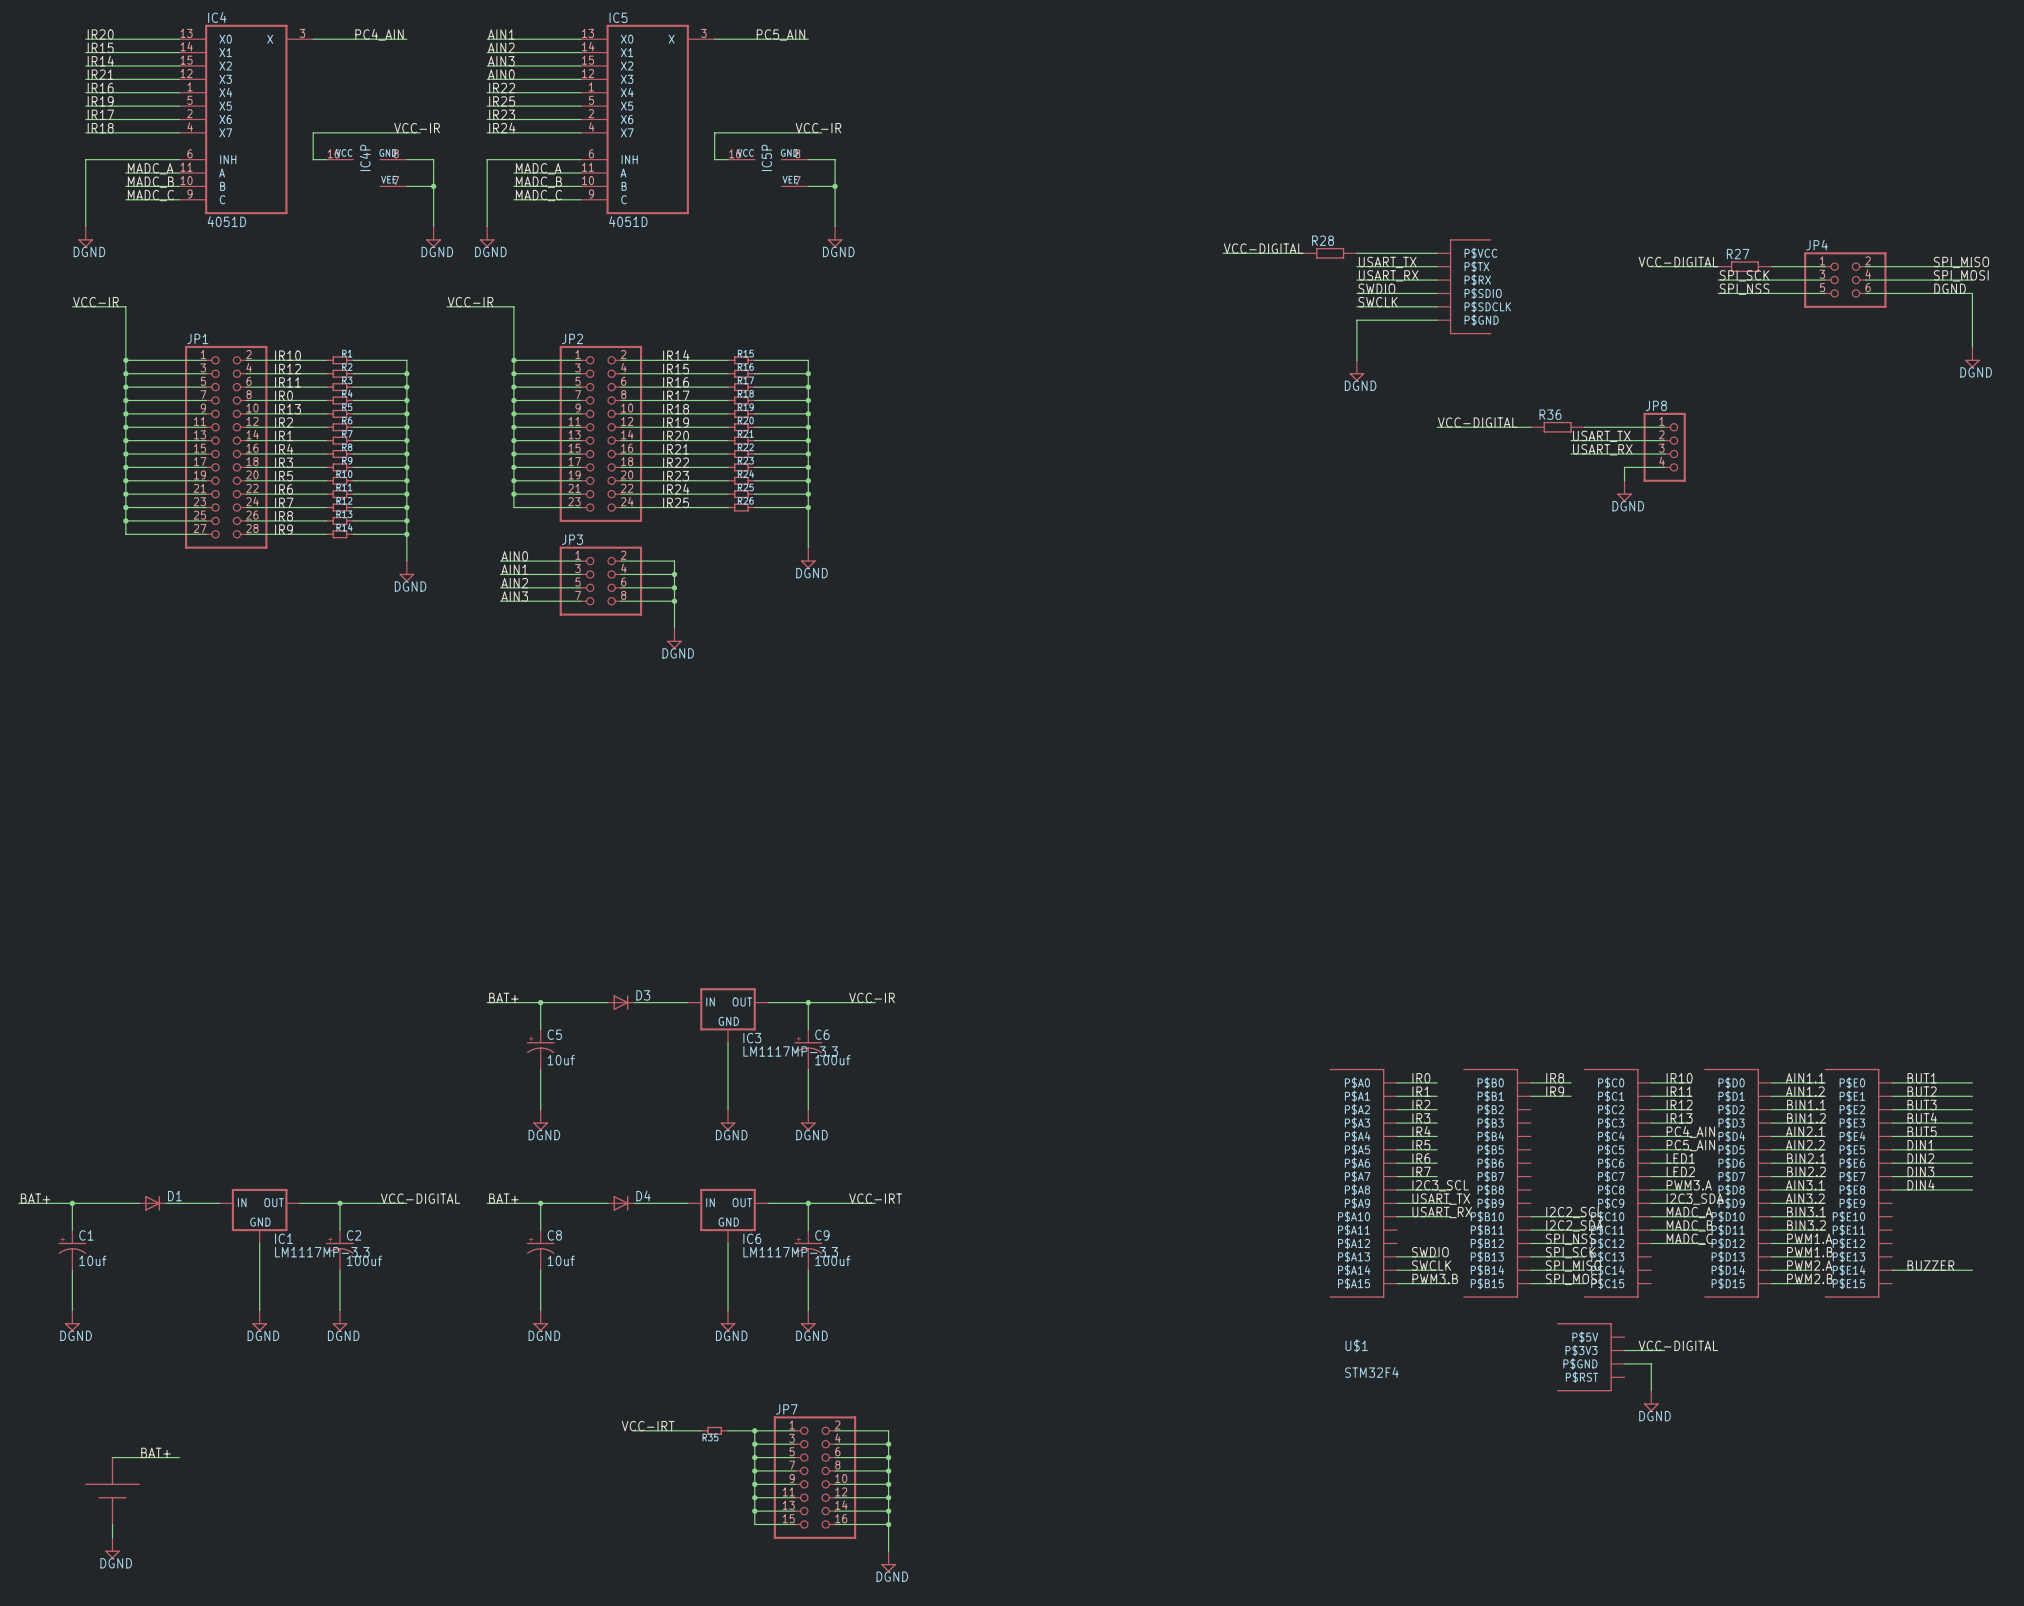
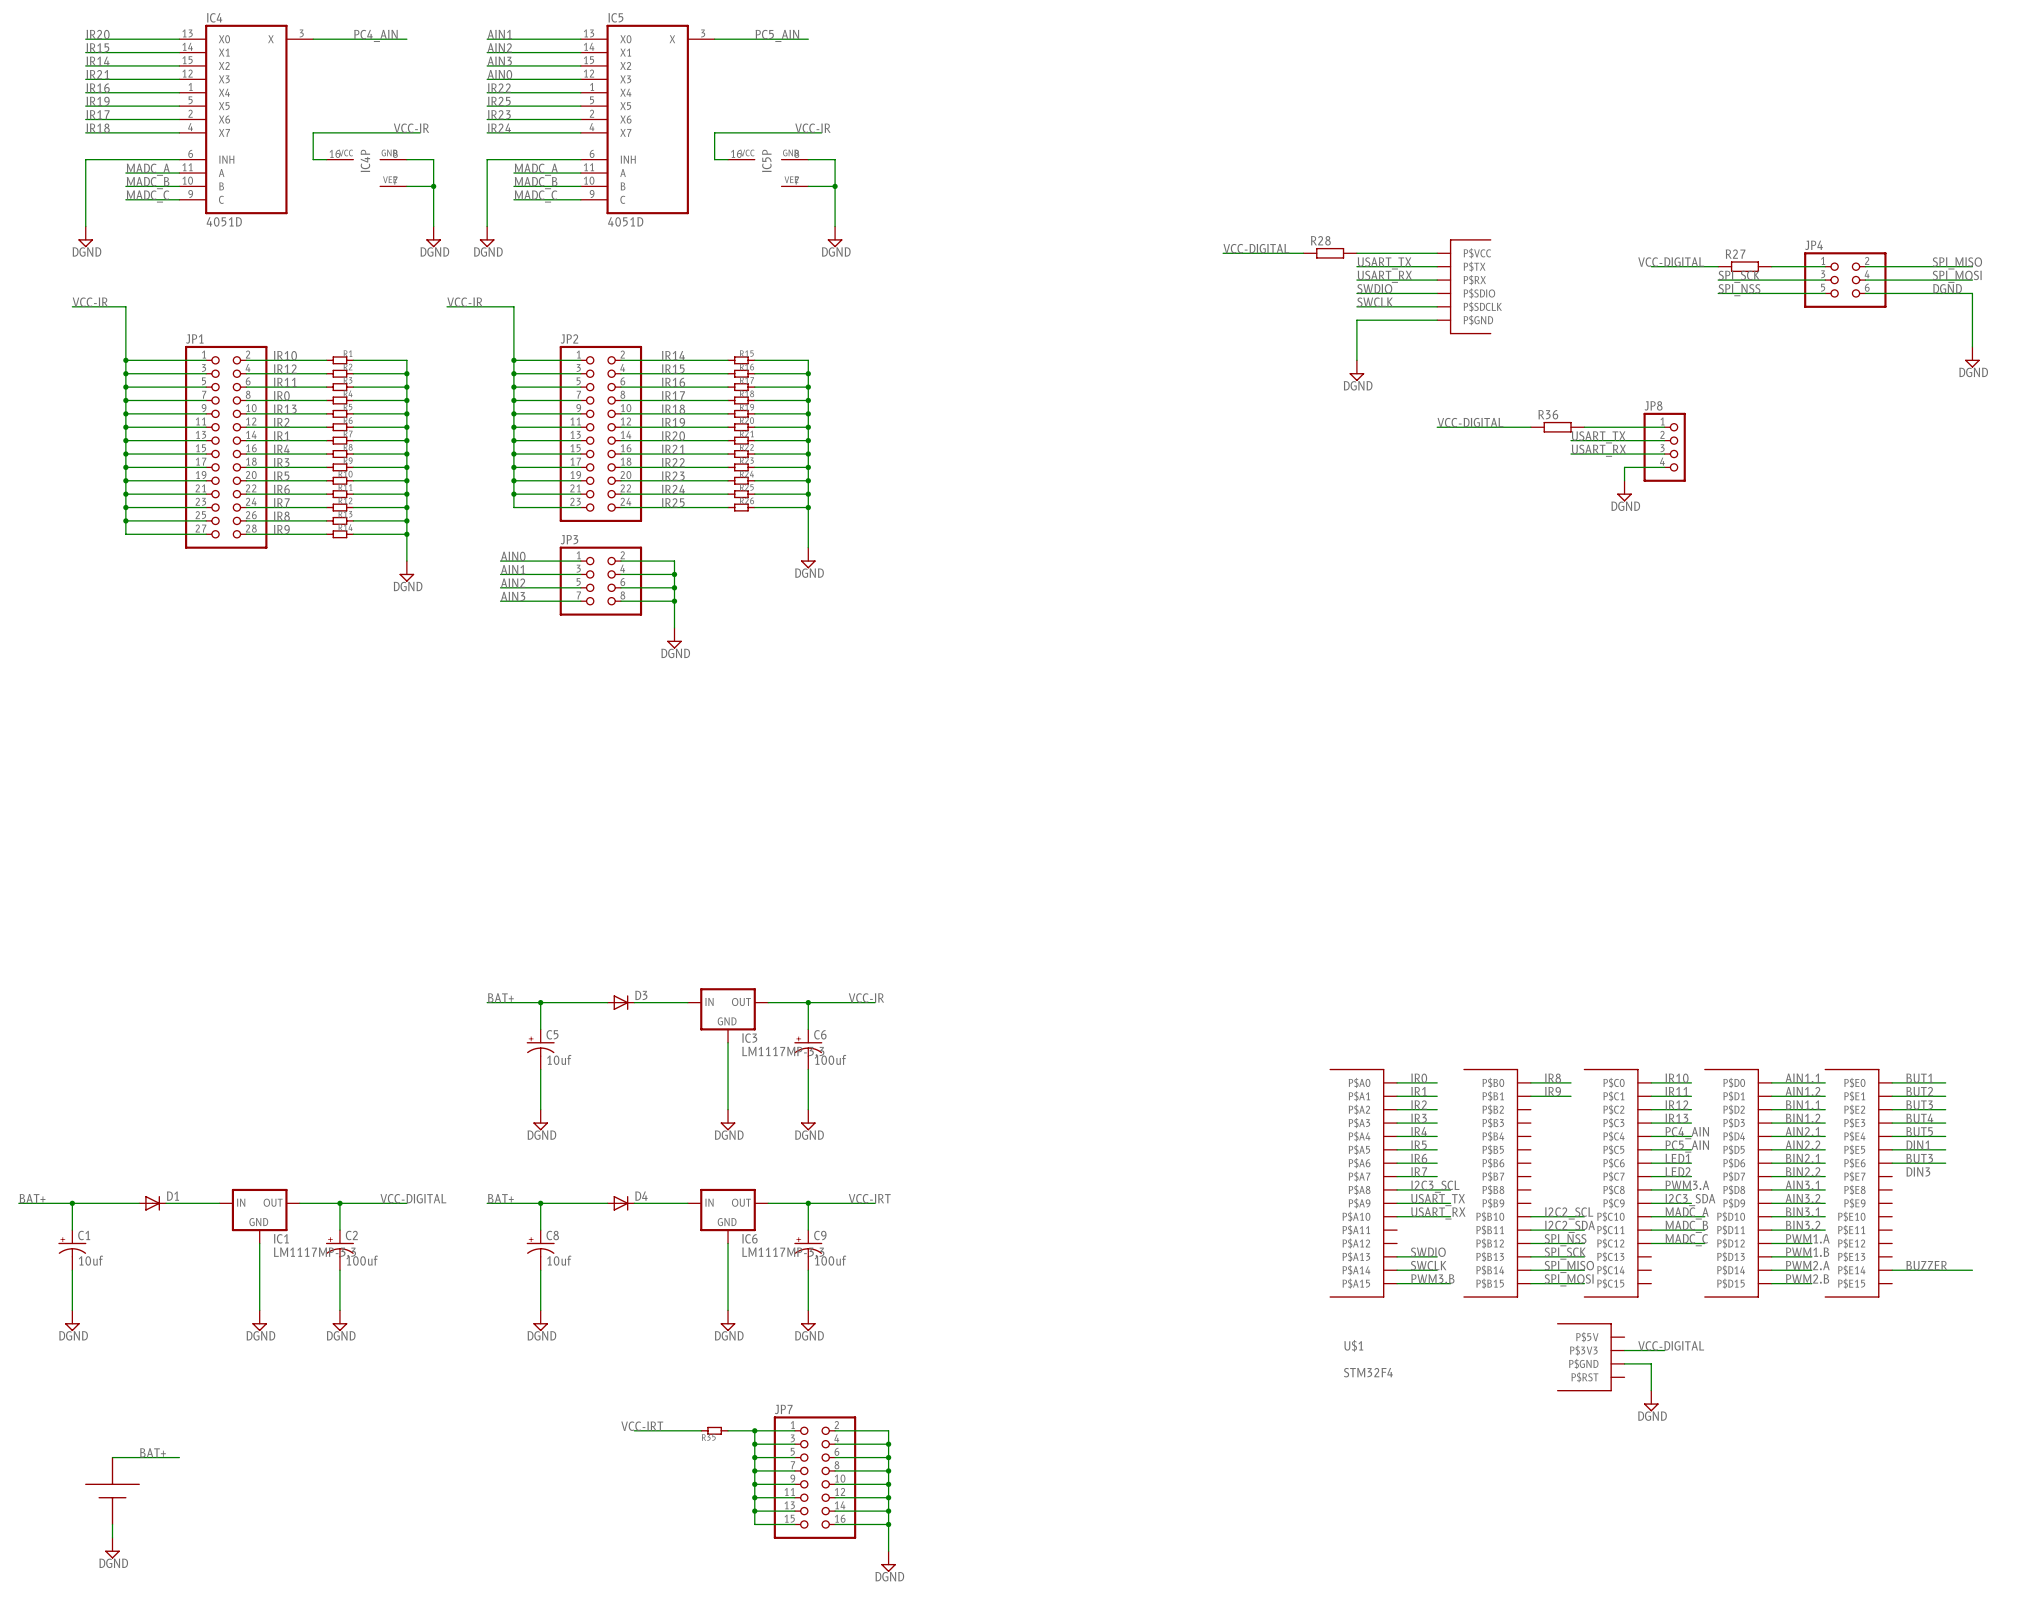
wire: (1945, 1082) (1972, 1082) -> none
wire: (1945, 1096) (1972, 1096) -> none
wire: (1945, 1109) (1972, 1109) -> none
wire: (1945, 1123) (1972, 1123) -> none
wire: (1945, 1136) (1972, 1136) -> none
wire: (1945, 1149) (1972, 1149) -> none
label: DIN2 (1920, 1158) -> BUT3 (1919, 1158)
wire: (1945, 1163) (1972, 1163) -> none
wire: (1892, 1176) (1972, 1176) -> none
label: DIN4 (1921, 1185) -> none
wire: (1892, 1189) (1972, 1189) -> none

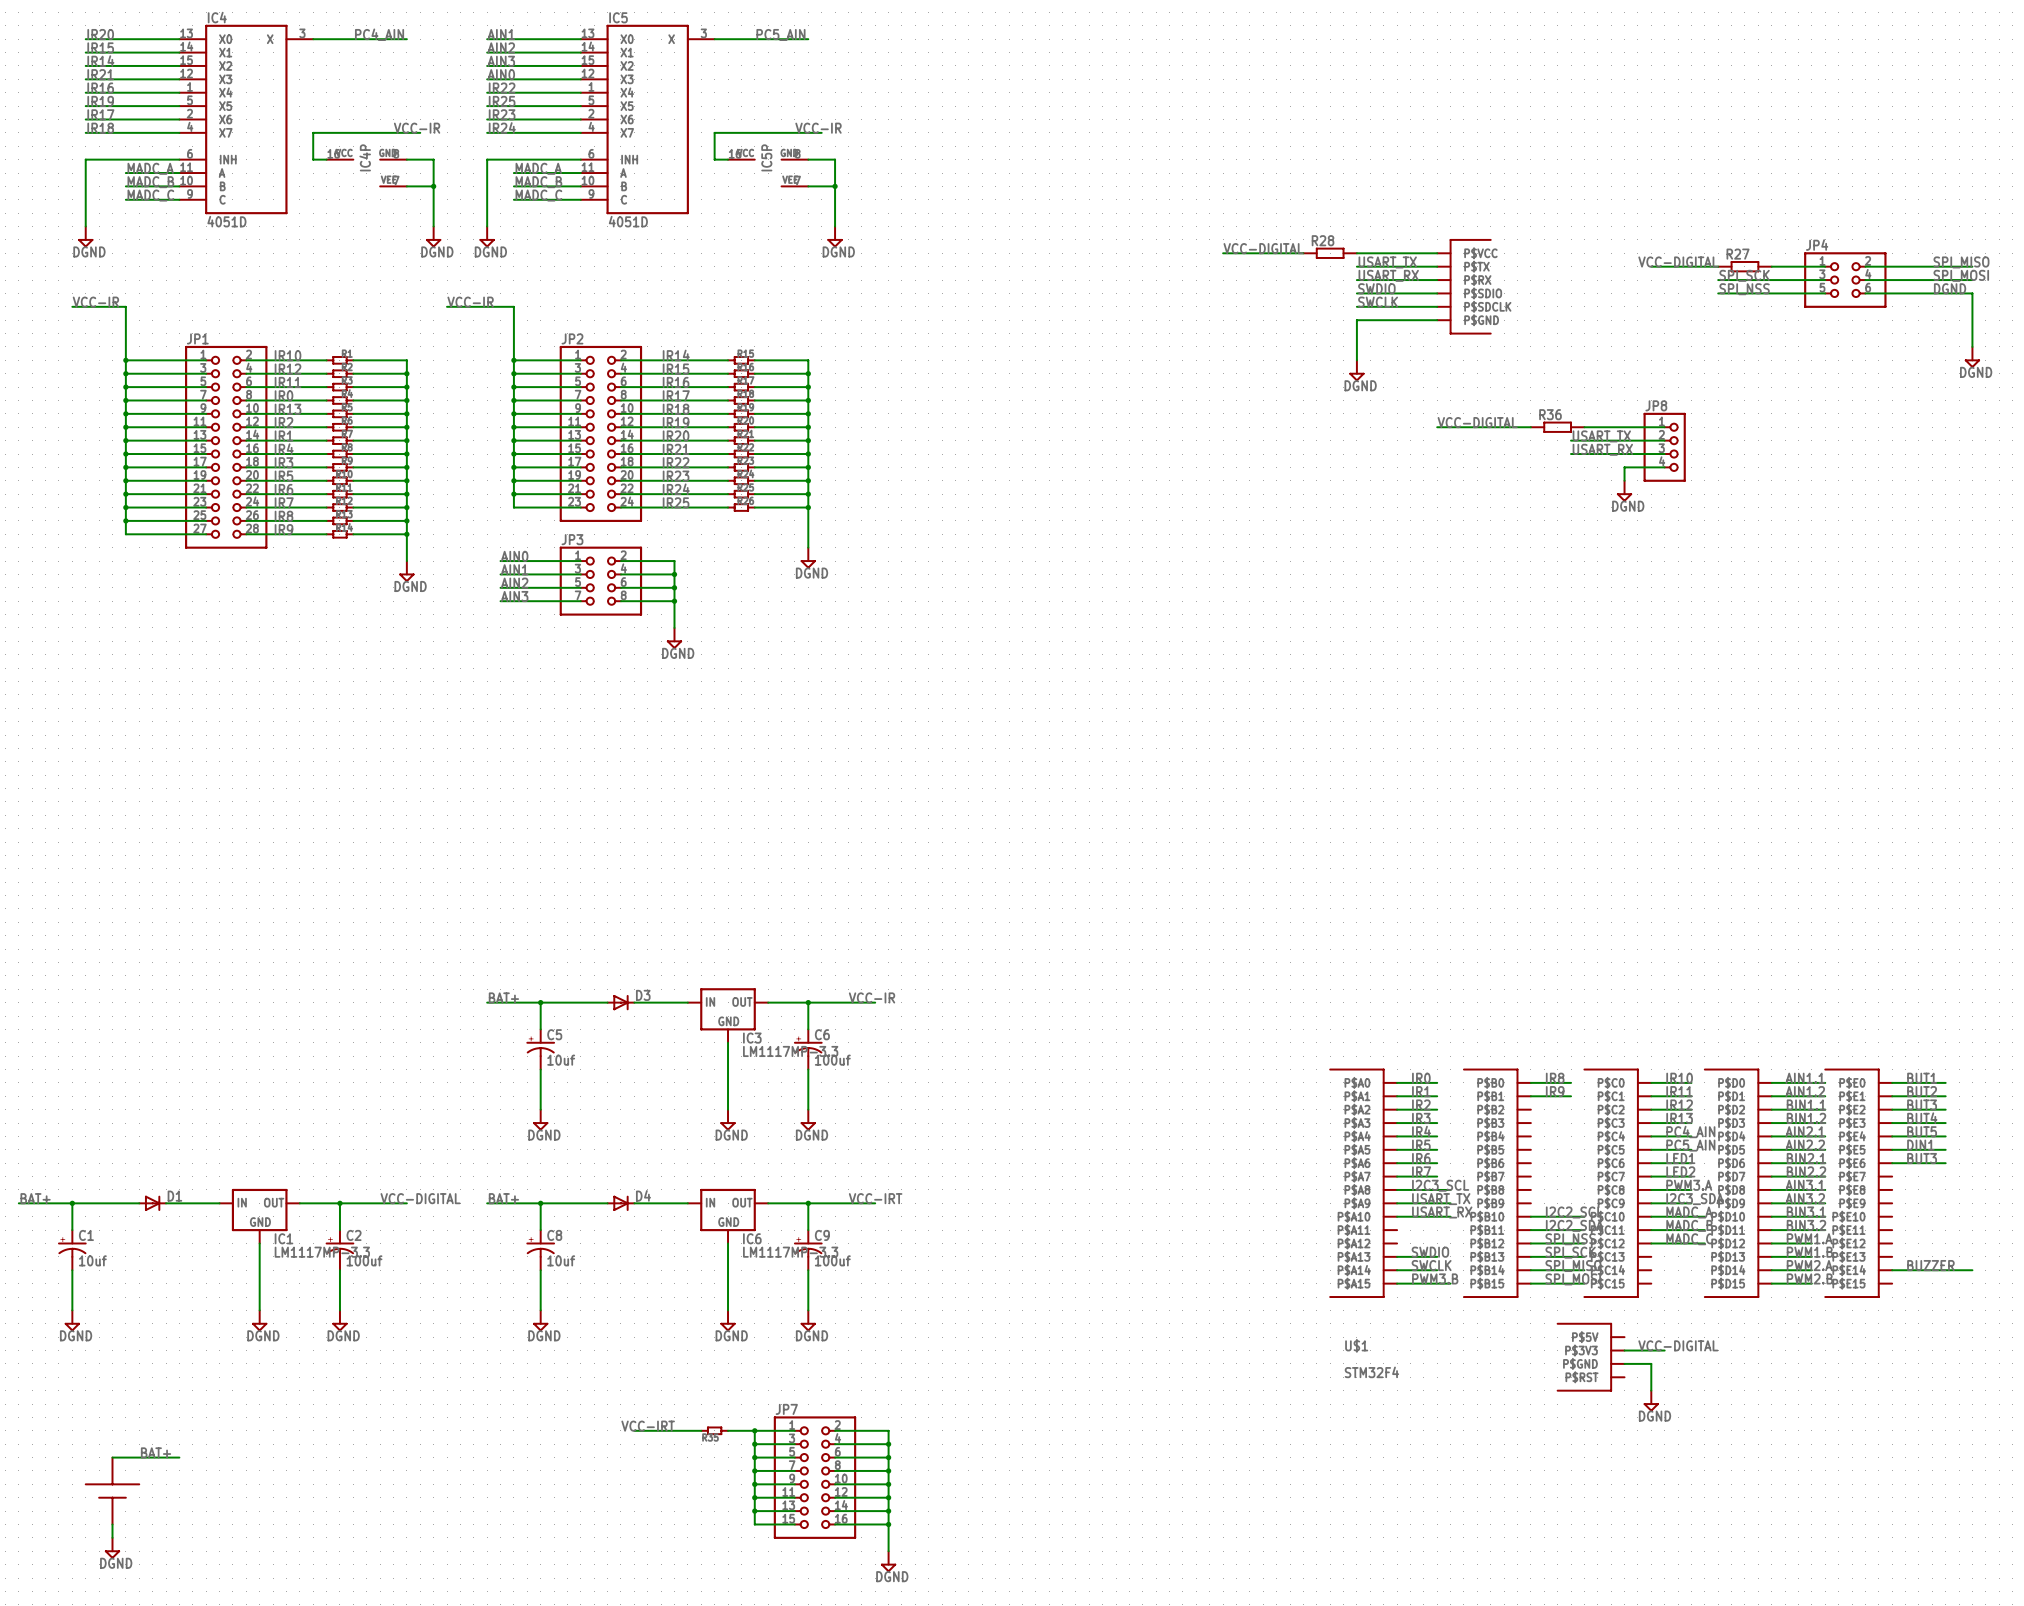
label: DIN3 (1918, 1171) -> none

